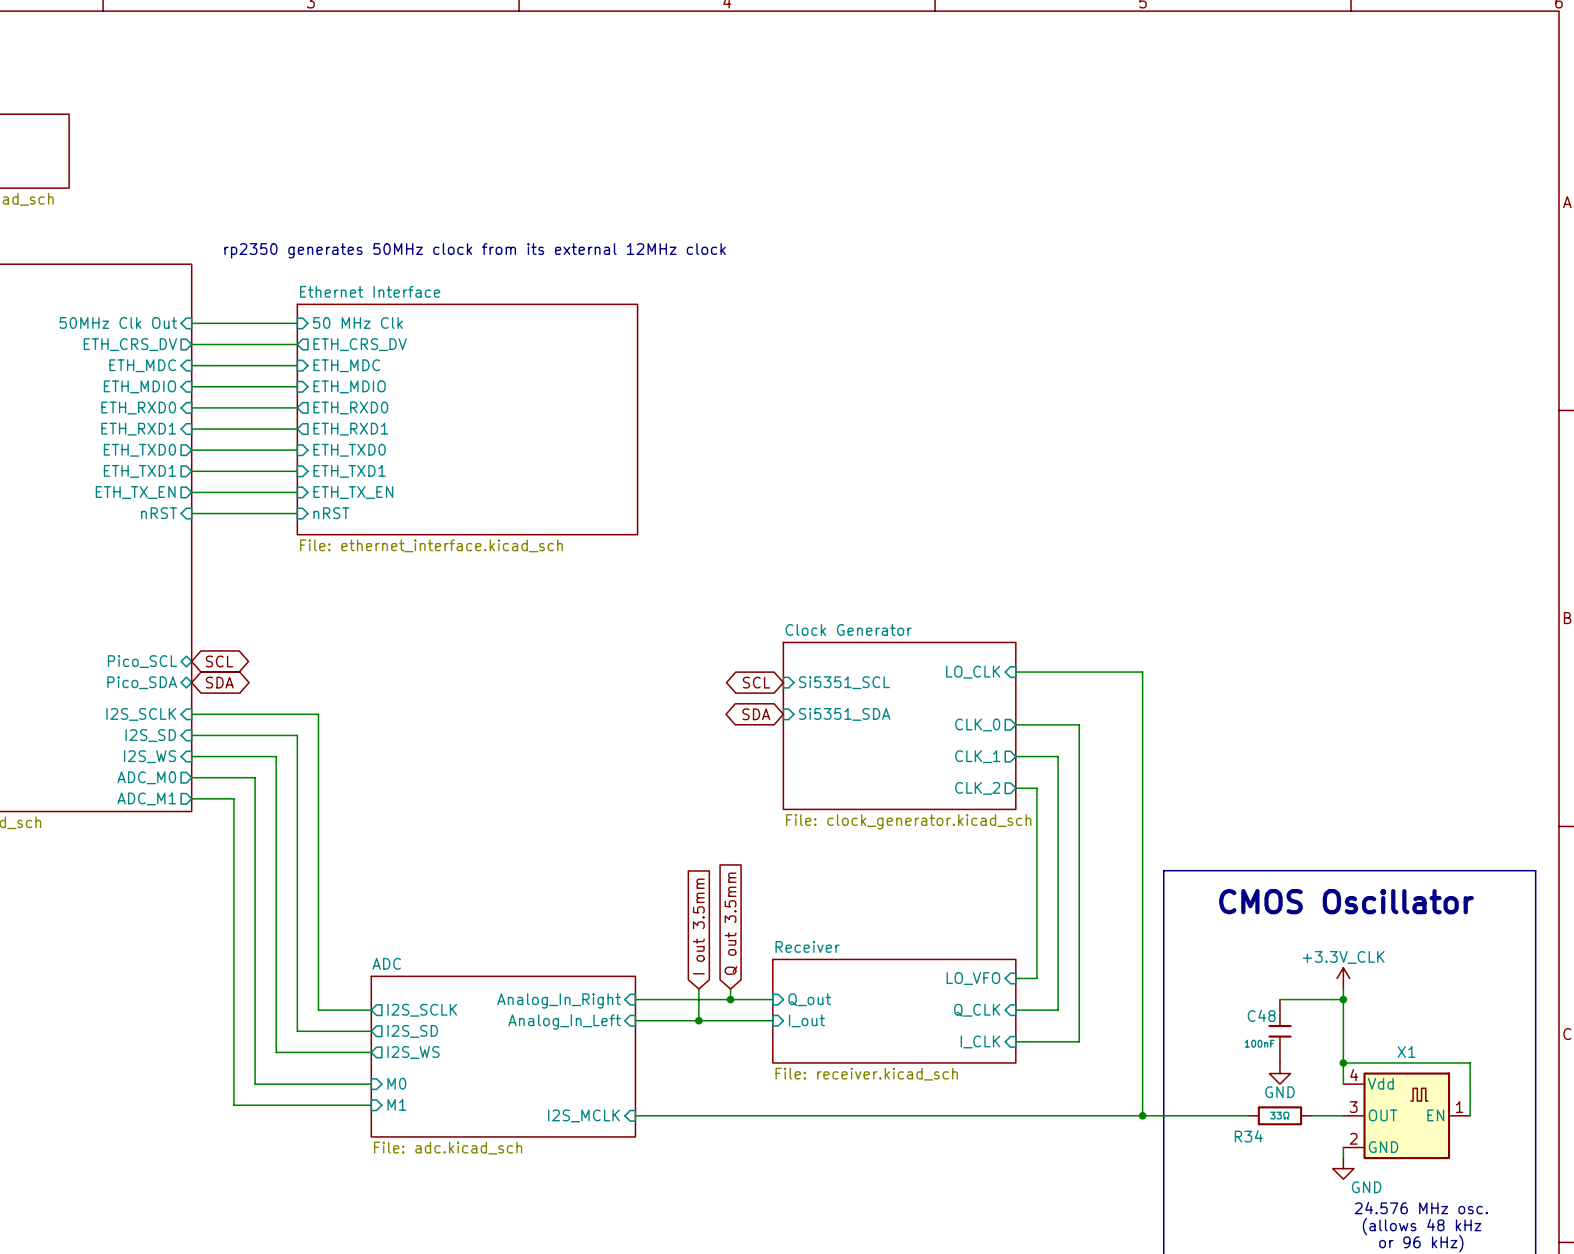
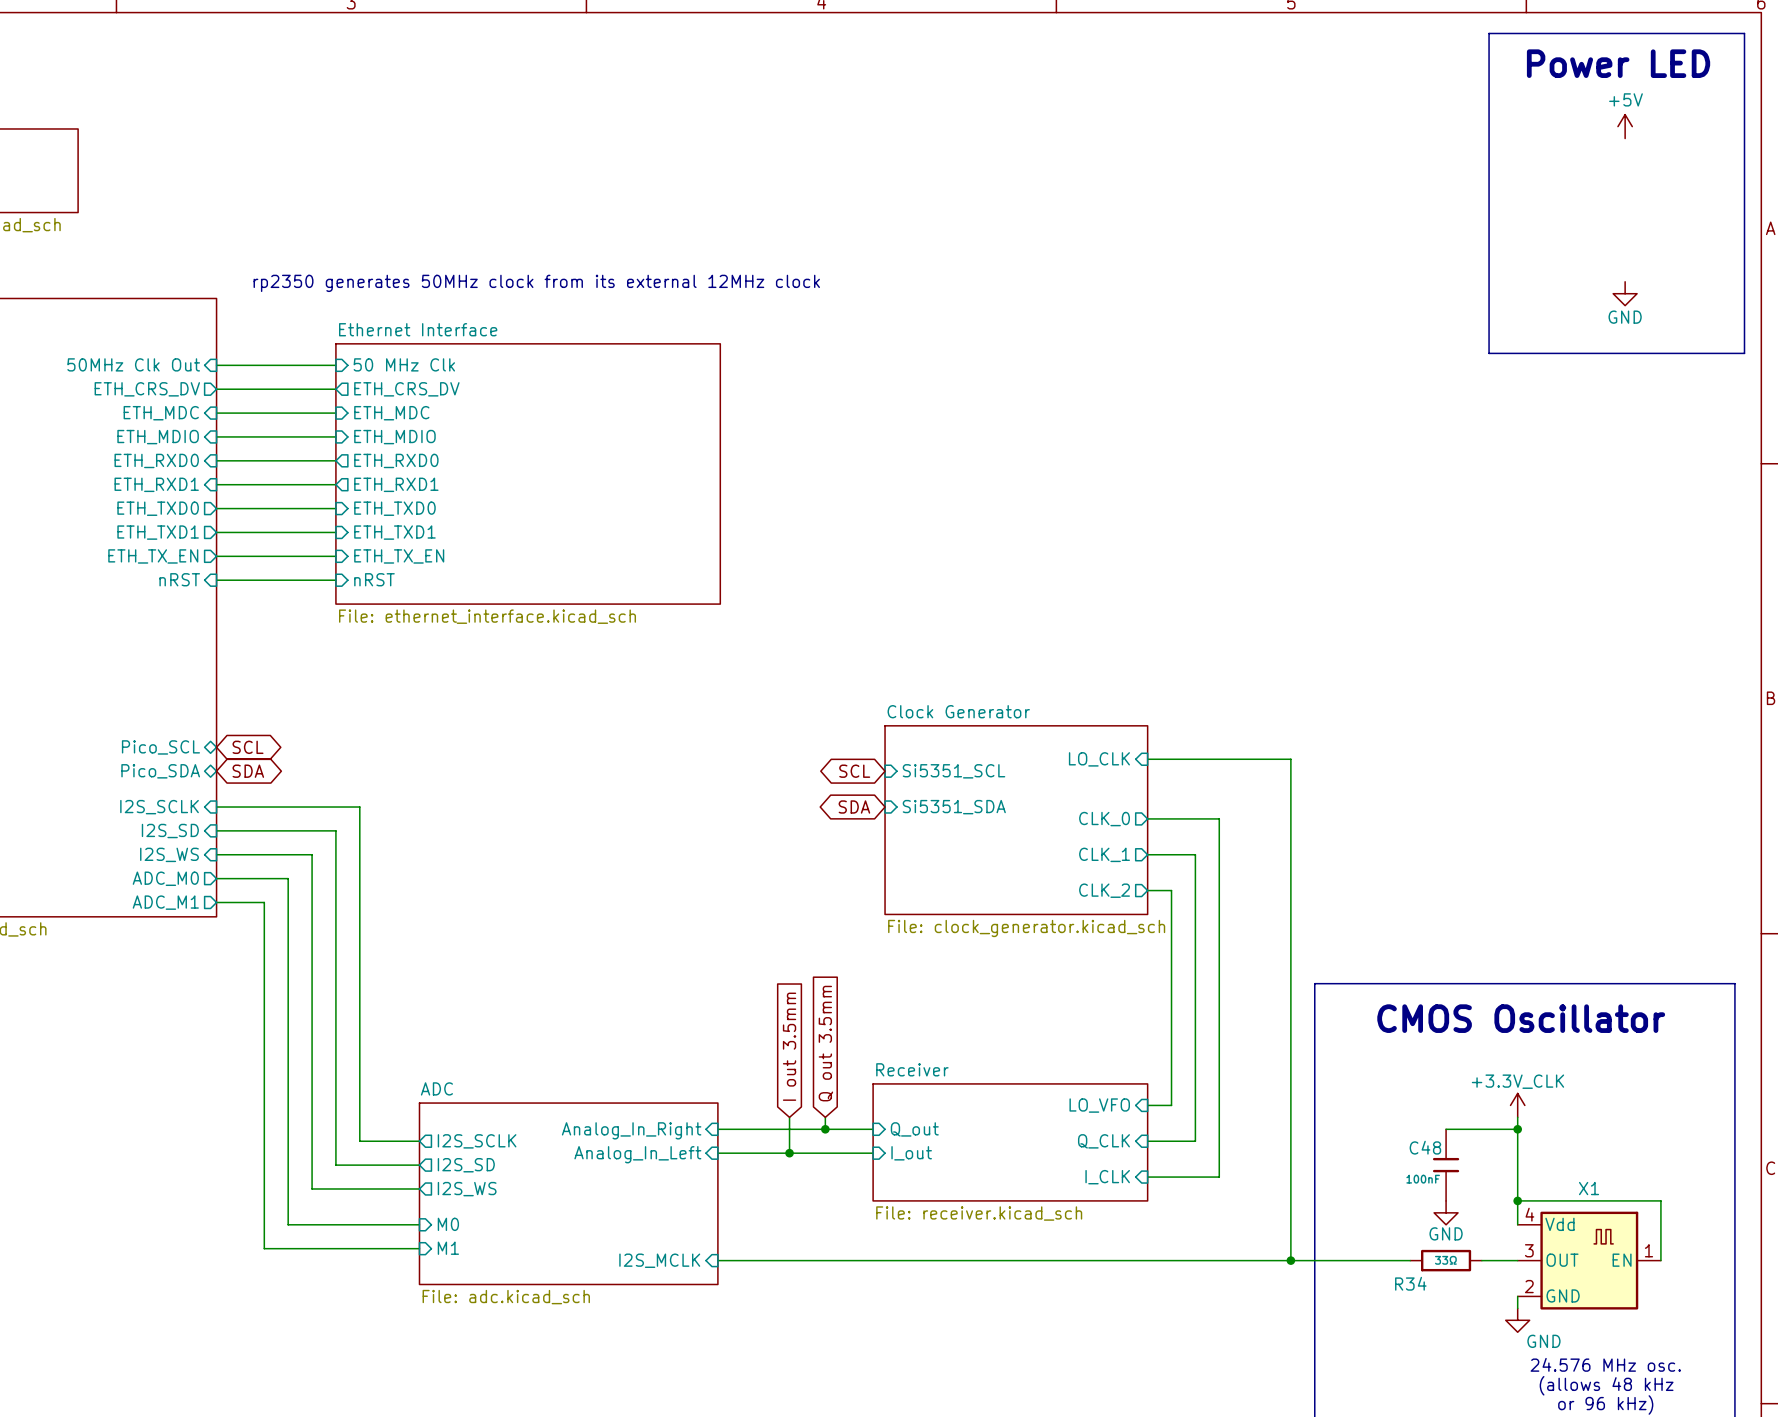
line: none -> (1489, 33) (1744, 33) (1744, 353) (1489, 353) (1489, 33)
text: none -> Power LED (1618, 63)
power symbol: none -> +5V (1625, 126)
power symbol: none -> GND (1625, 293)

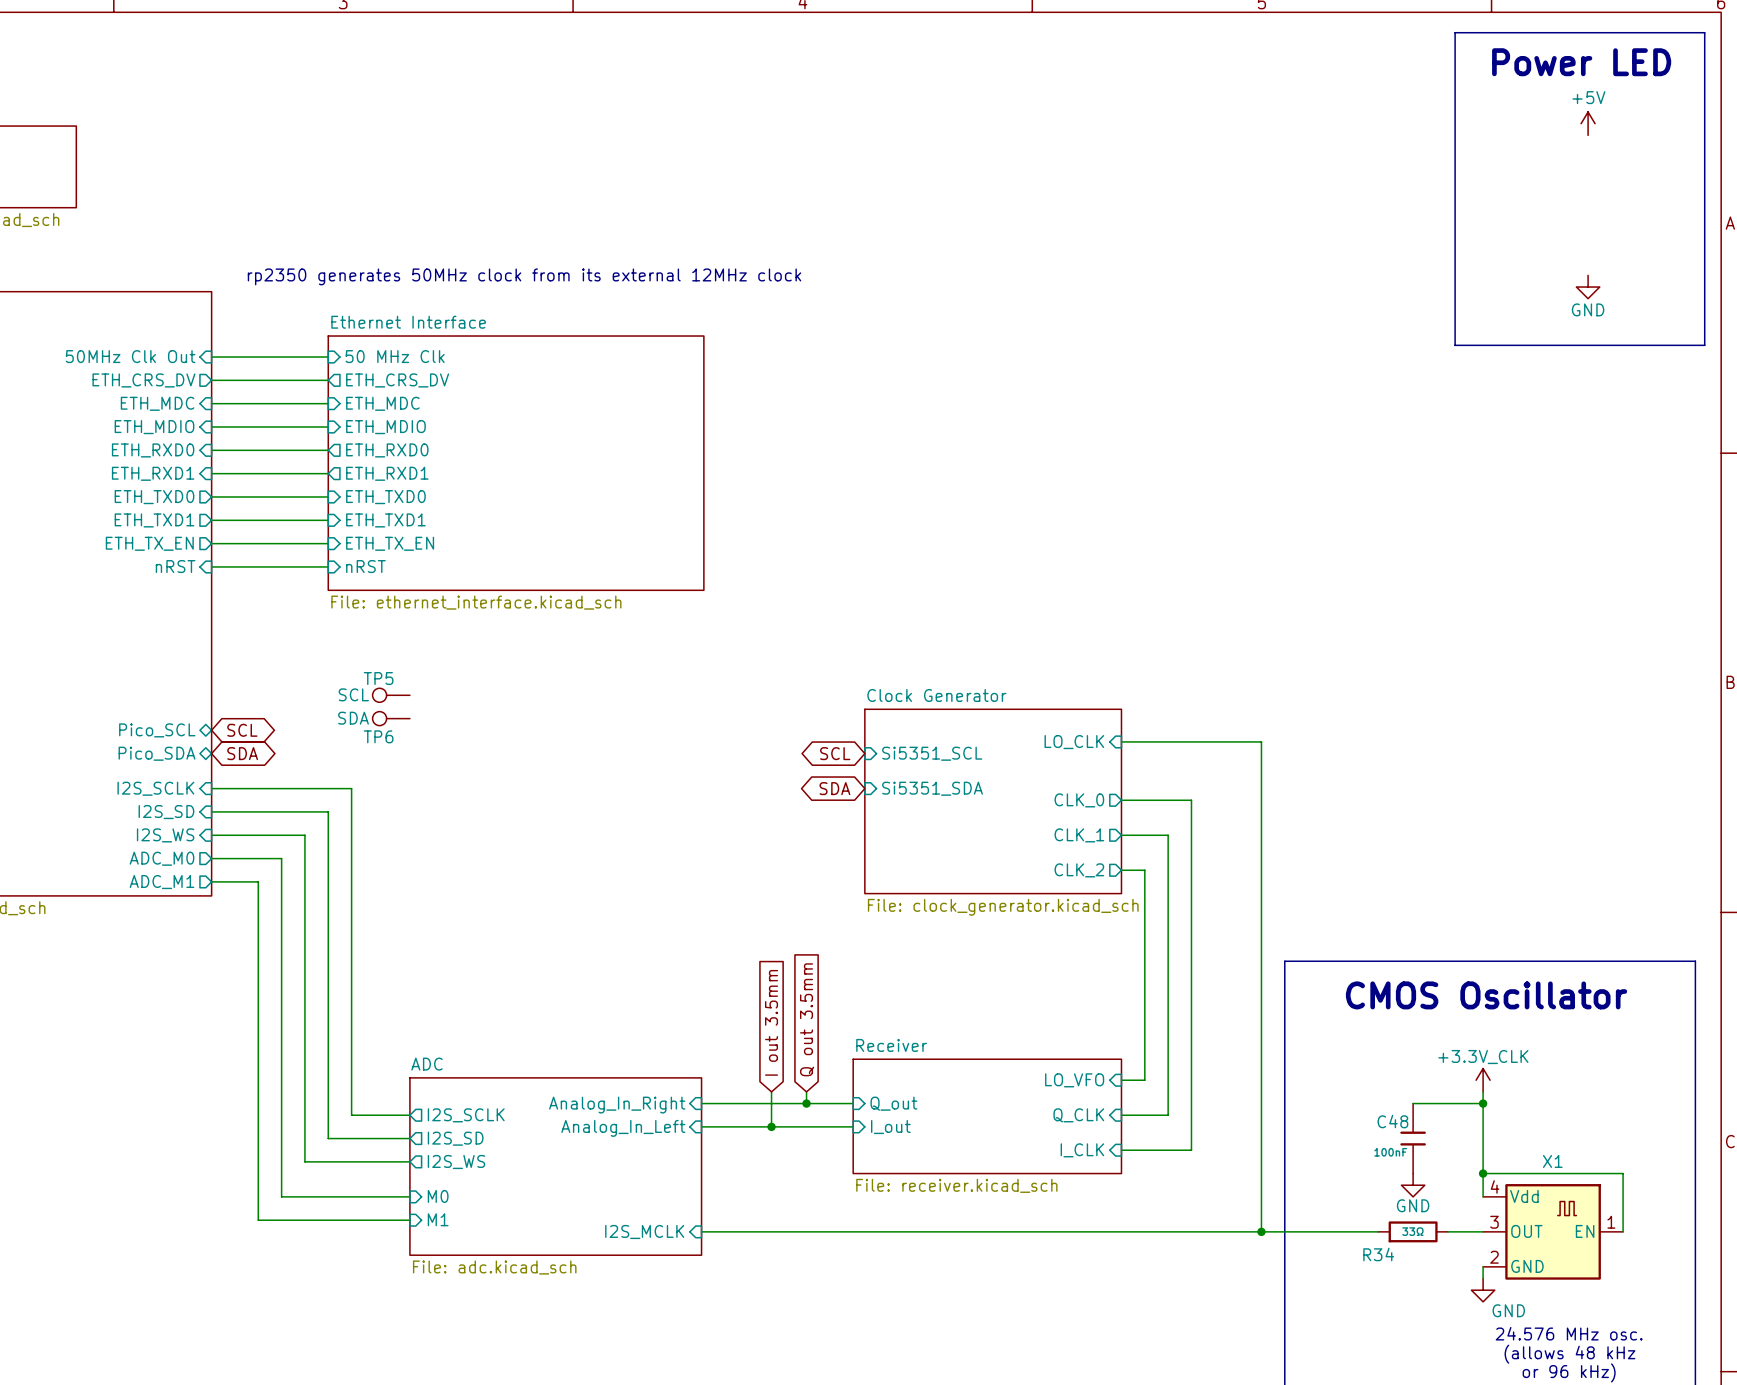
TP5: none -> SCL (391, 695)
TP6: none -> SDA (391, 718)

